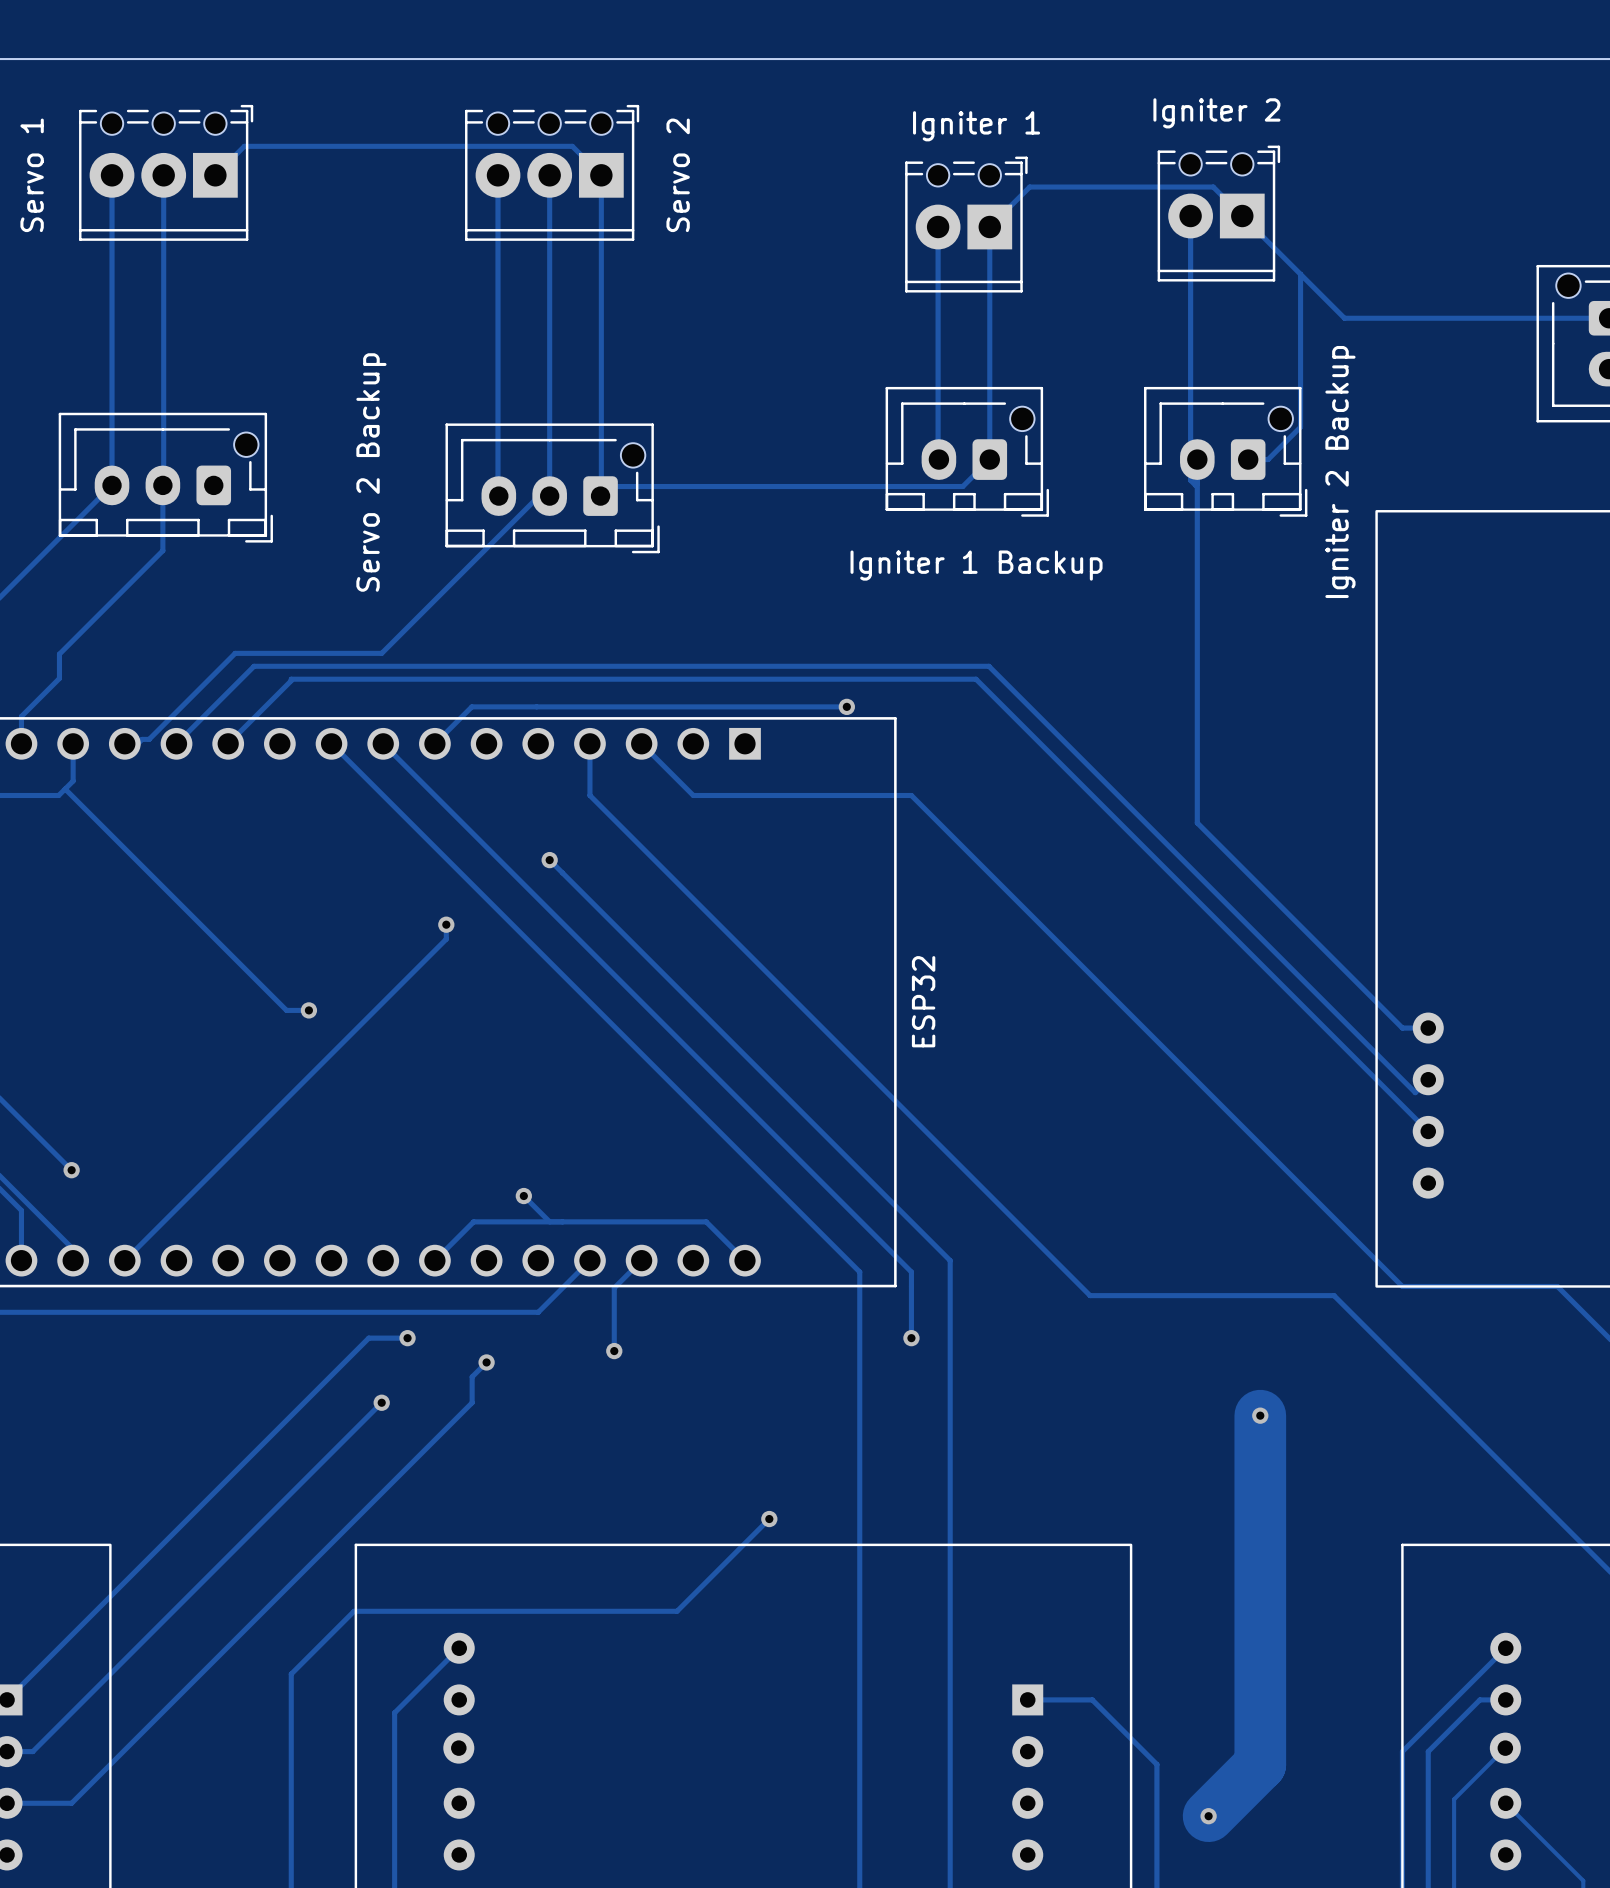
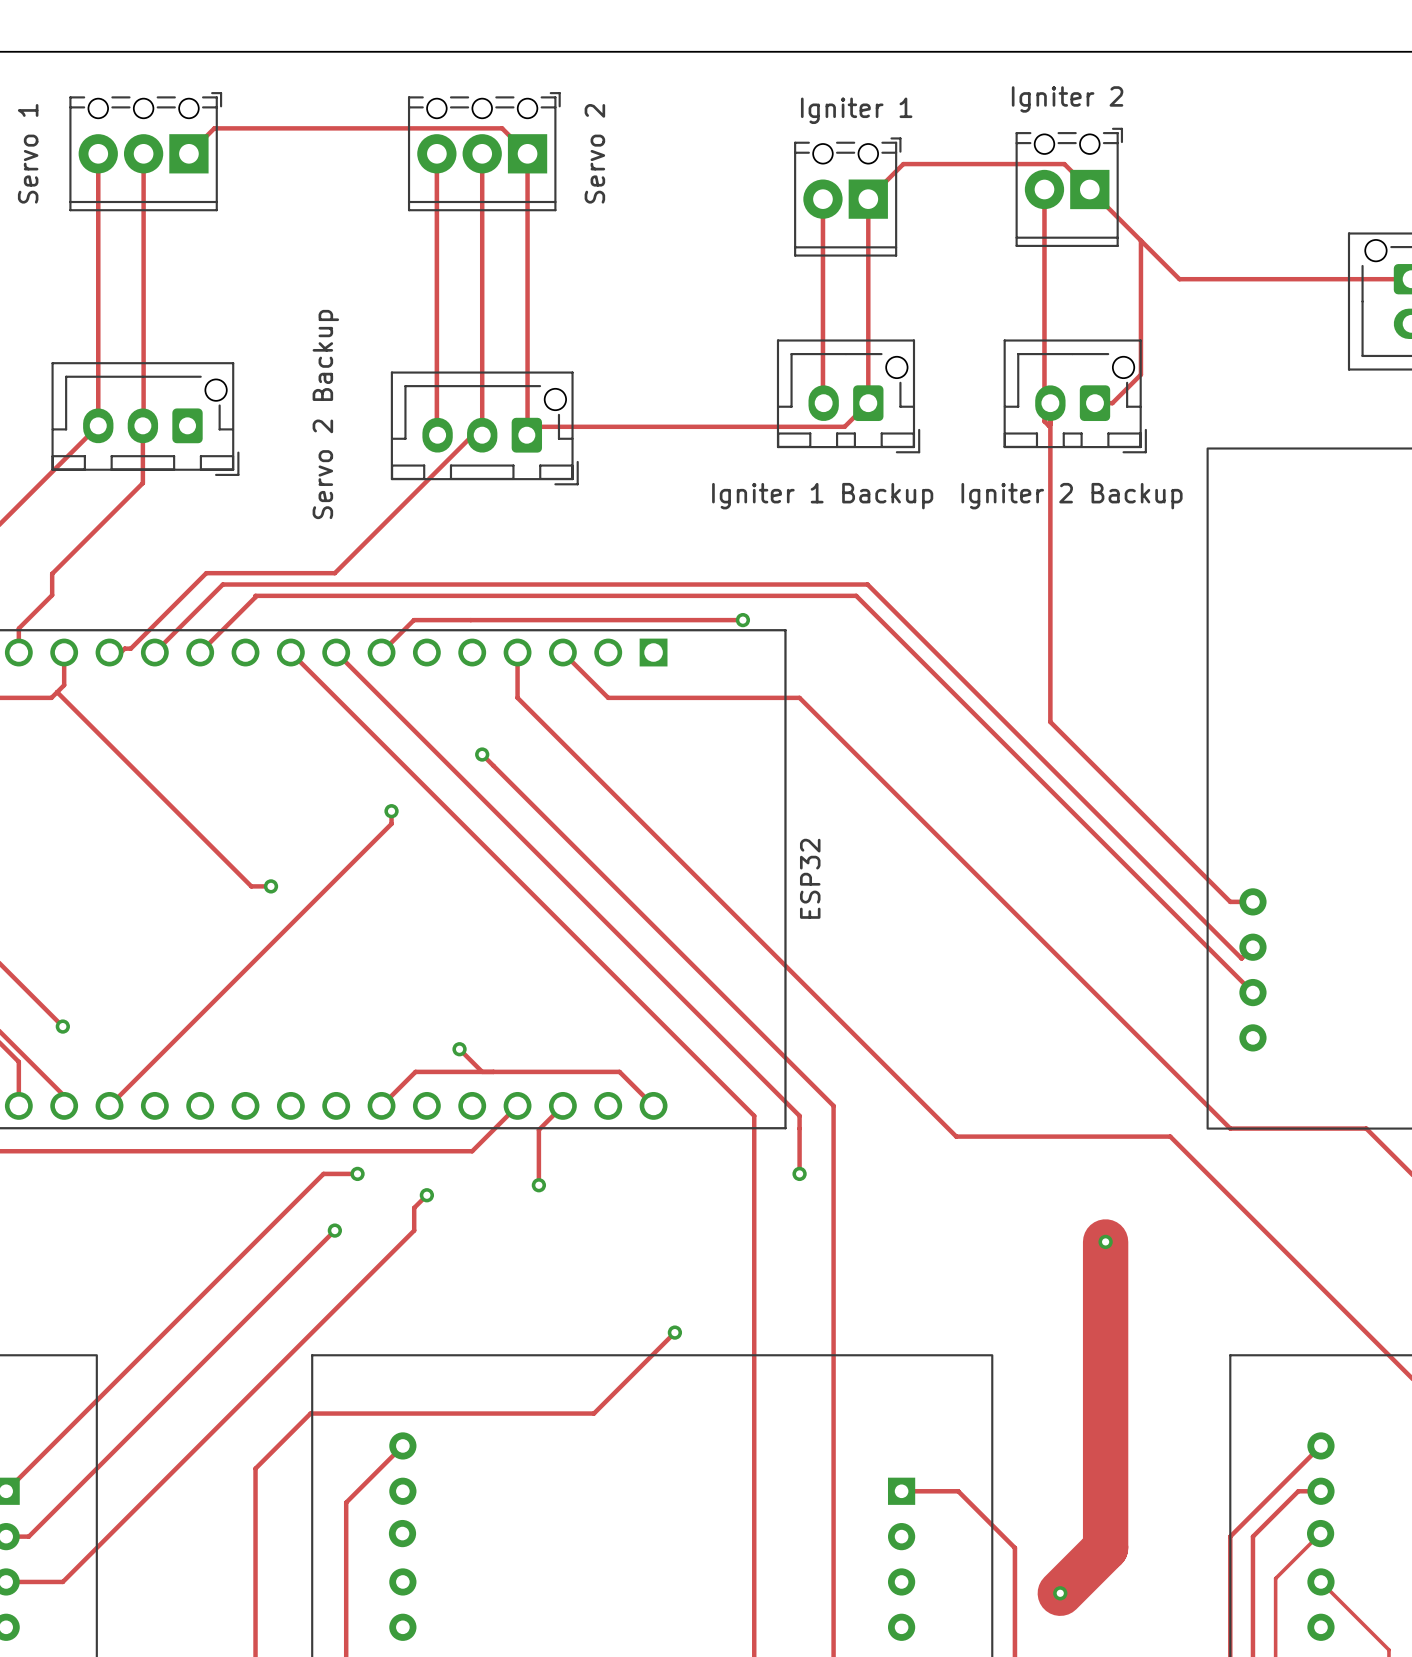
Igniter 2 Backup name rotation: 0° (1340, 472) -> 90° clockwise (1072, 496)
Igniter 1 Backup name position: Igniter 1 Backup (976, 565) -> Igniter 1 Backup (822, 496)

